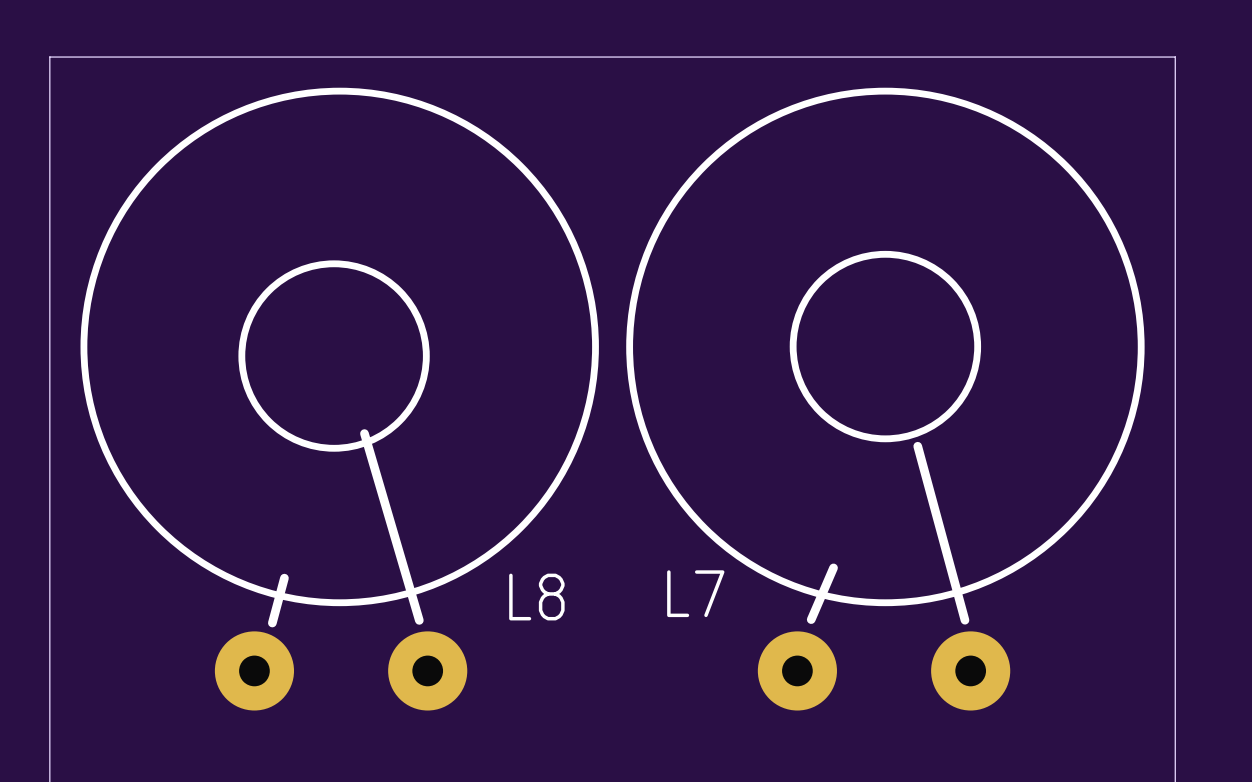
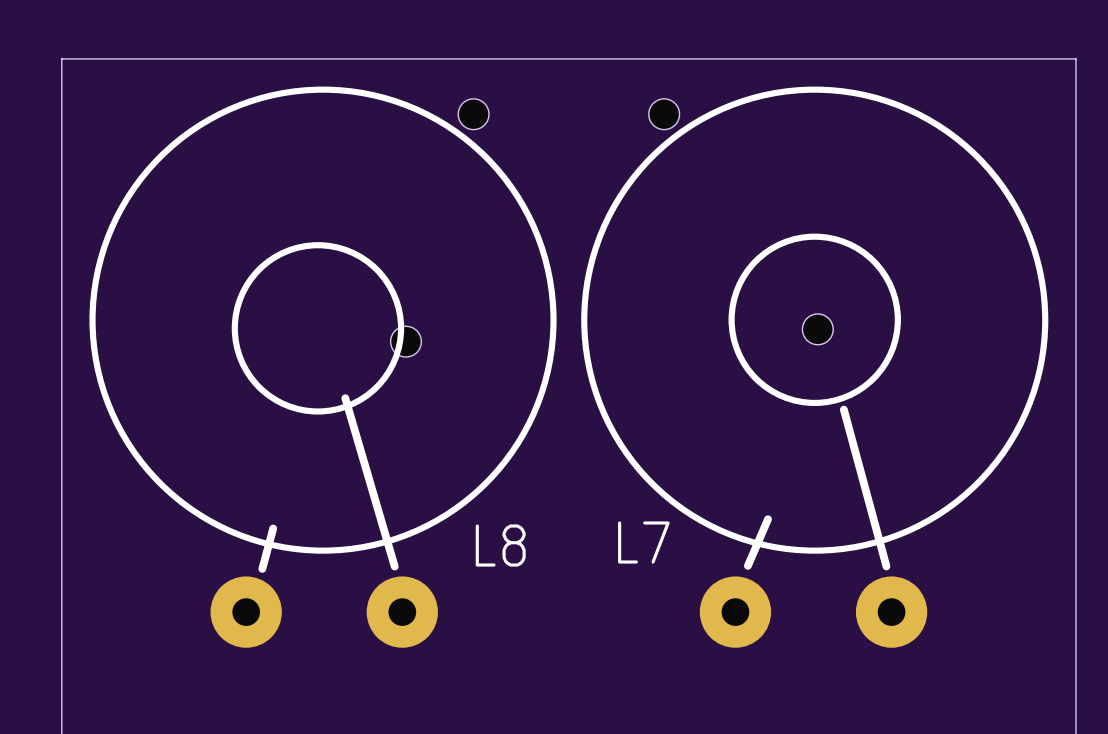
hole: none -> (473, 114)
hole: none -> (664, 114)
hole: none -> (817, 329)
hole: none -> (406, 341)

